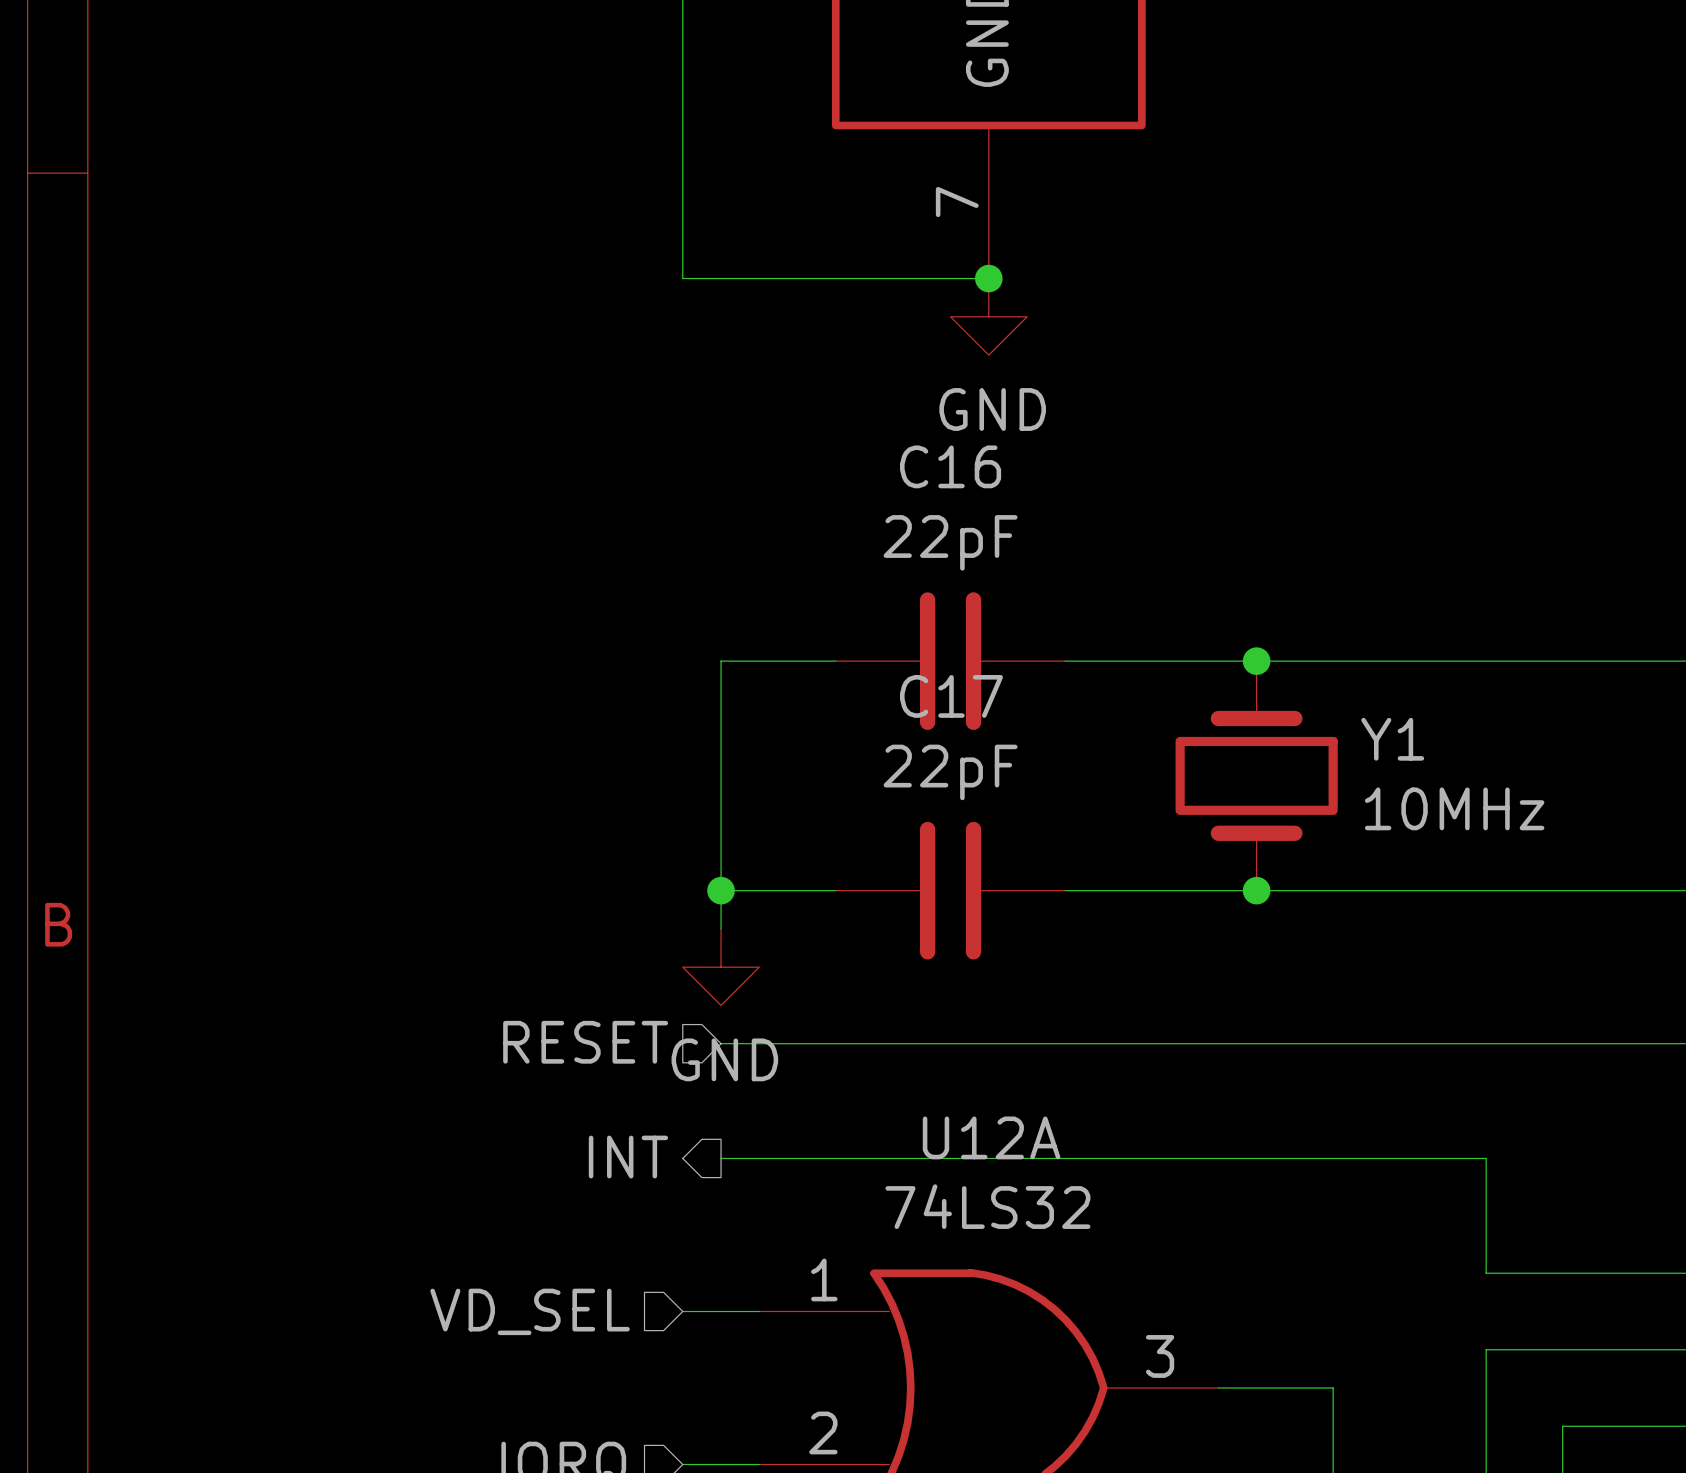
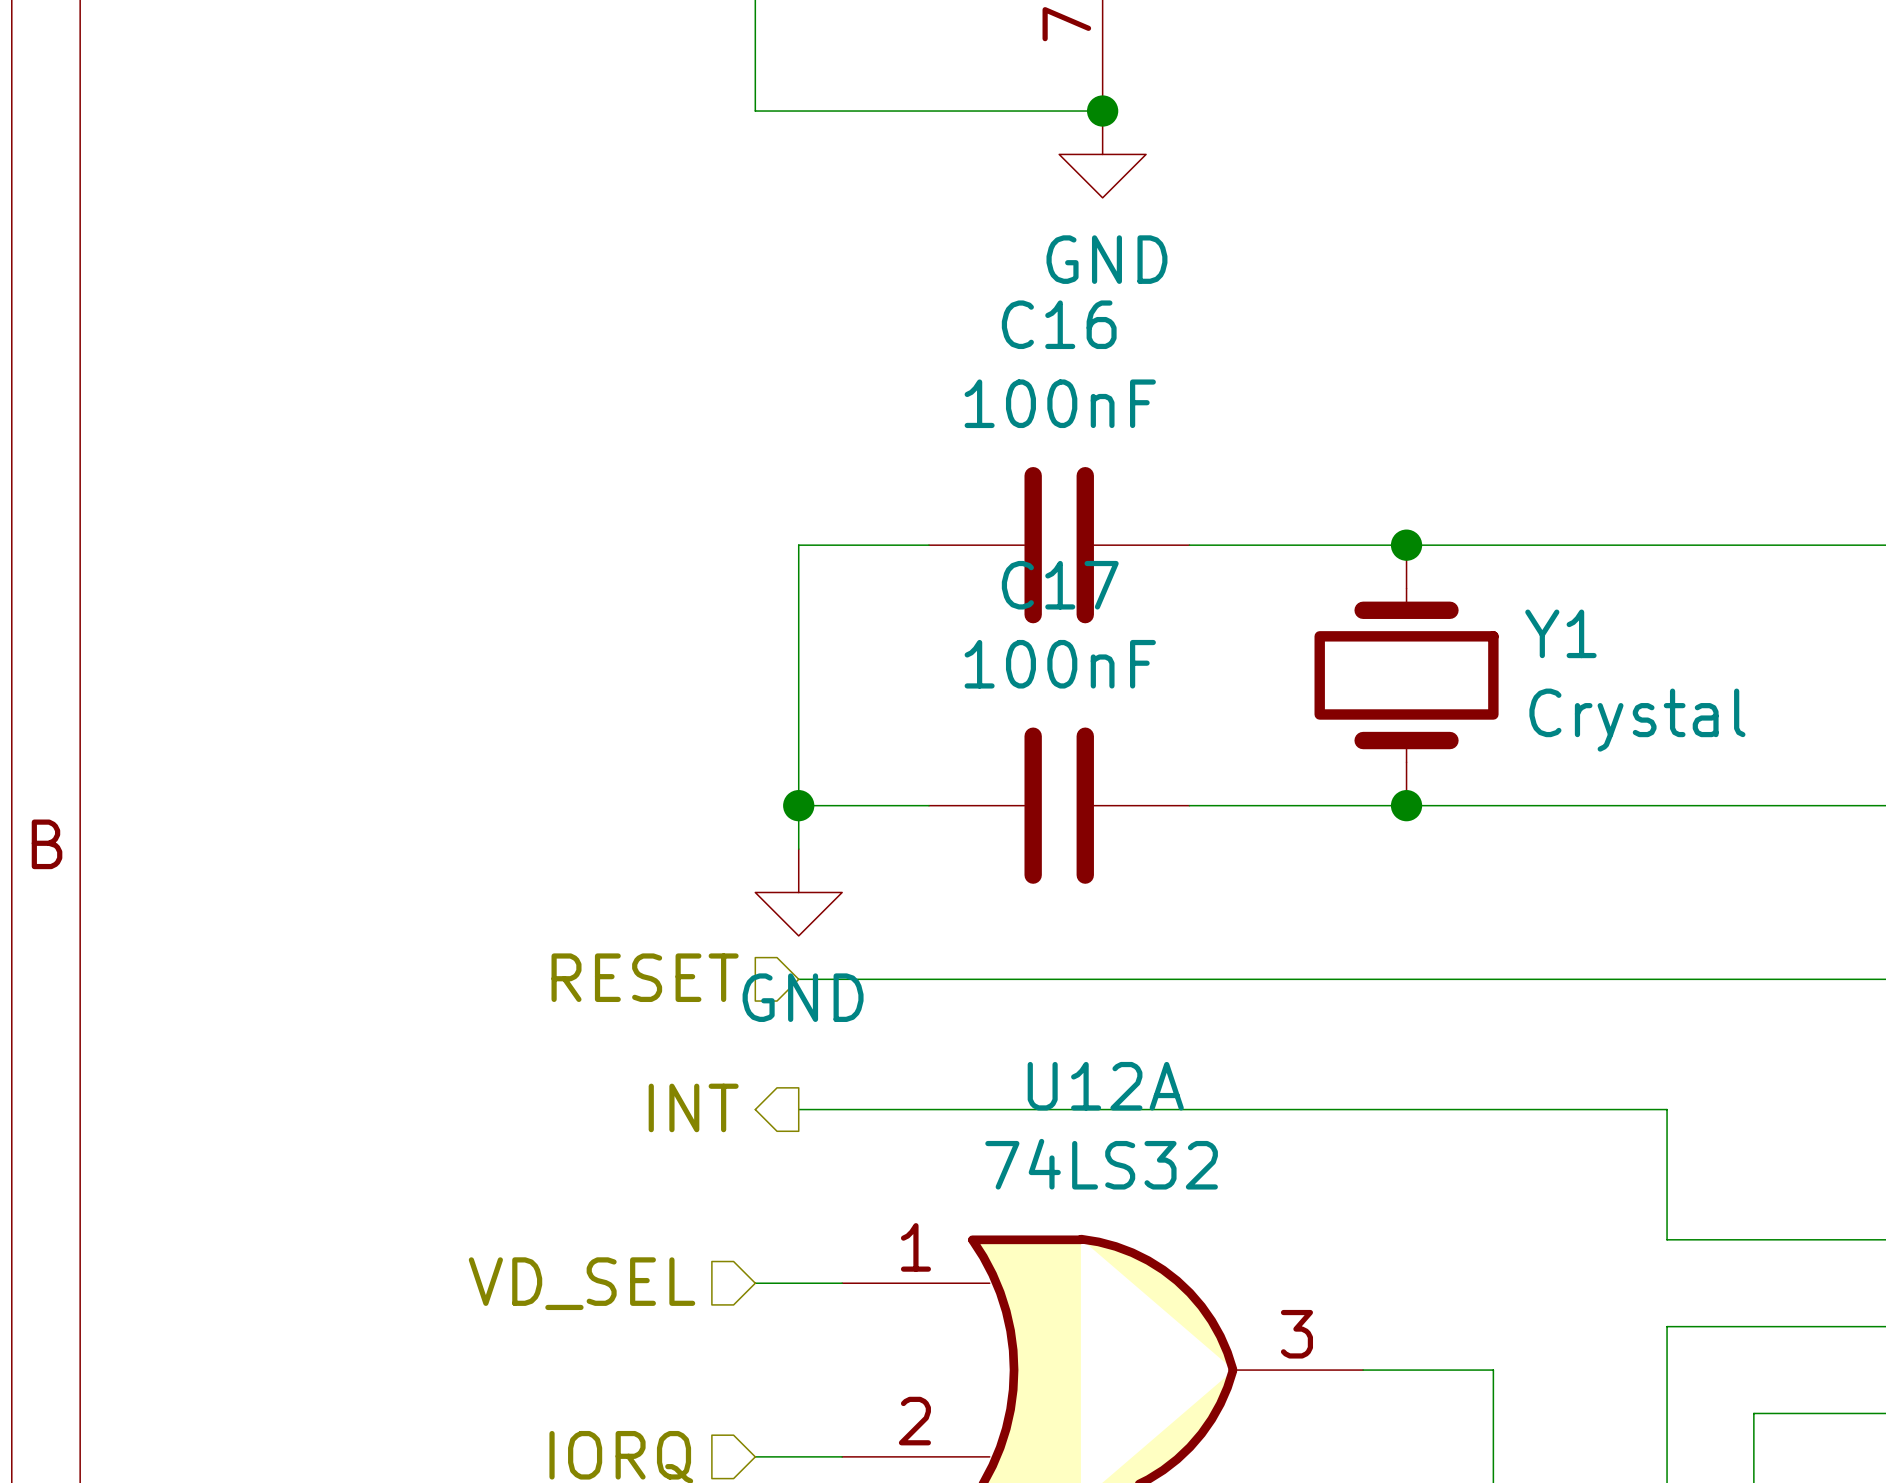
C16 value: 22pF (950, 542) -> 100nF (1060, 403)
C17 value: 22pF (950, 772) -> 100nF (1060, 664)
Y1 value: 10MHz (1454, 808) -> Crystal (1637, 720)

